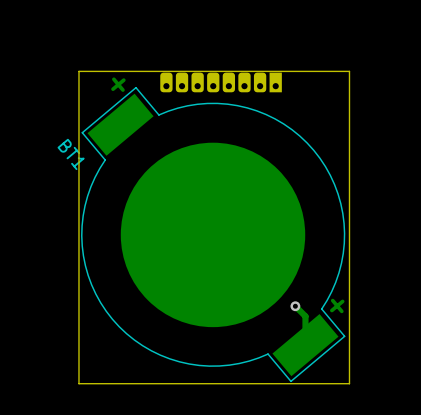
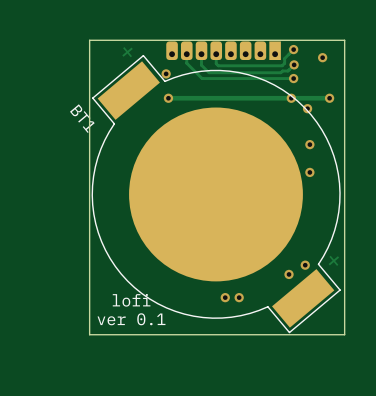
track: none -> (290, 49) (293, 49) (284, 58) (284, 63) (282, 65) (218, 65) (216, 63) (216, 54)
via: none -> (293, 49)
track: none -> (186, 54) (186, 63) (202, 78) (293, 78)
track: none -> (201, 54) (201, 65) (209, 72) (280, 72) (288, 71) (294, 64)
via: none -> (322, 57)
via: none -> (294, 64)
via: none -> (166, 73)
via: none -> (293, 78)
via: none -> (168, 98)
via: none -> (291, 98)
track: none -> (329, 98) (168, 98)
via: none -> (329, 98)
via: none -> (307, 108)
via: none -> (309, 144)
via: none -> (309, 172)
track: (295, 306) (305, 316) (305, 345) -> none
via: (295, 306) -> none
via: none -> (305, 265)
via: none -> (289, 274)
via: none -> (225, 297)
via: none -> (239, 297)
text: none -> lofi (131, 300)
text: none -> ver 0.1 (131, 319)

